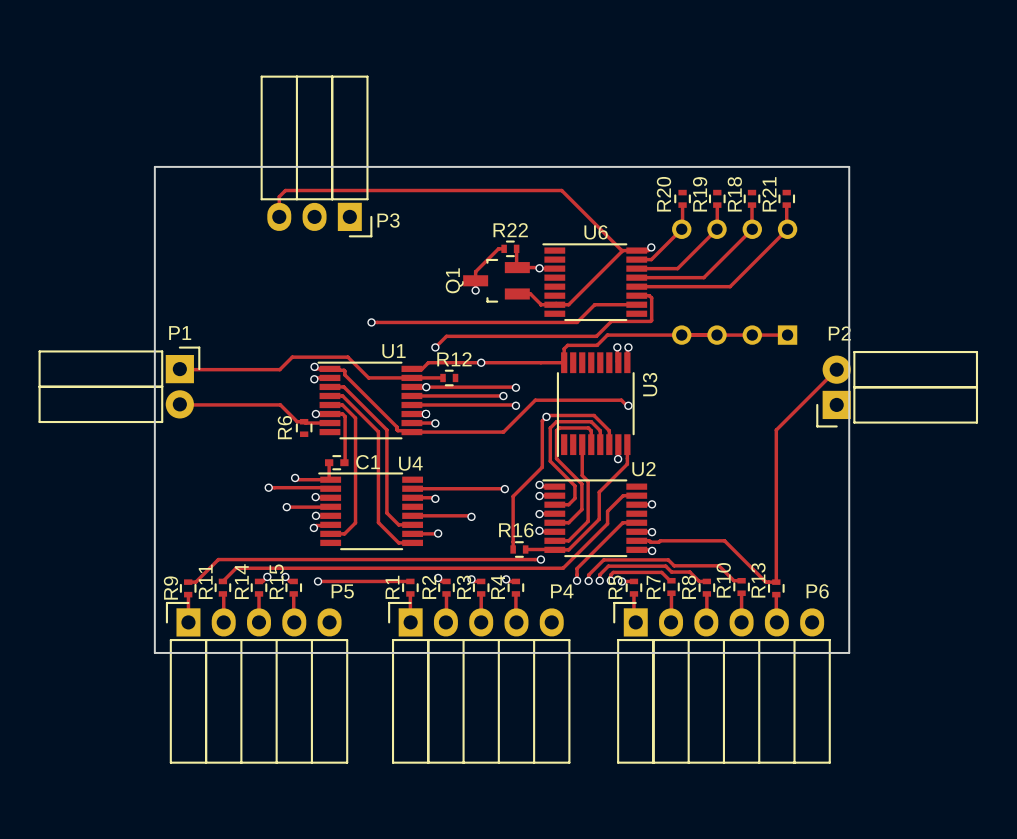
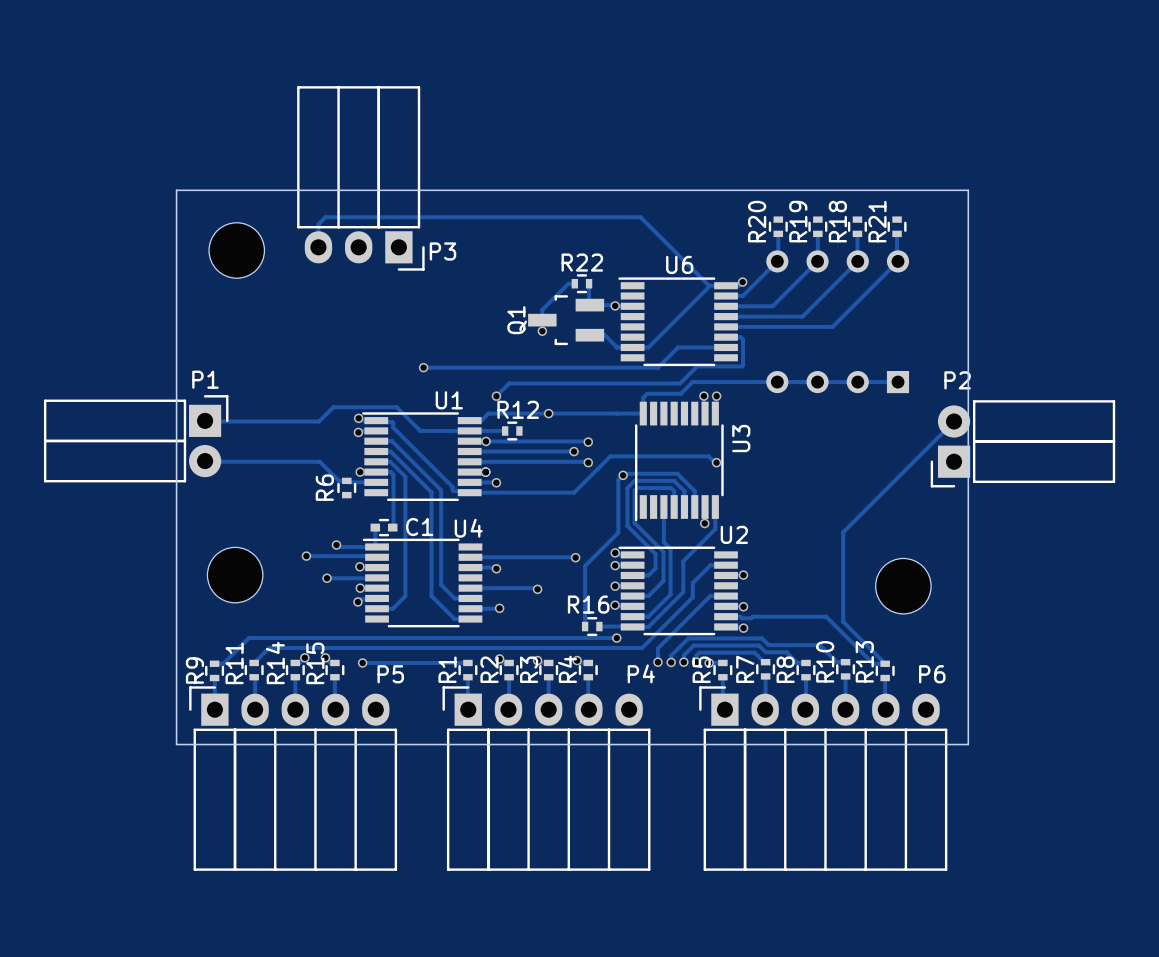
part: none -> (236, 250)
track: (776, 430) (776, 582) -> (885, 490) (843, 532) (843, 621) (885, 663)
part: none -> (235, 575)
part: none -> (903, 586)

